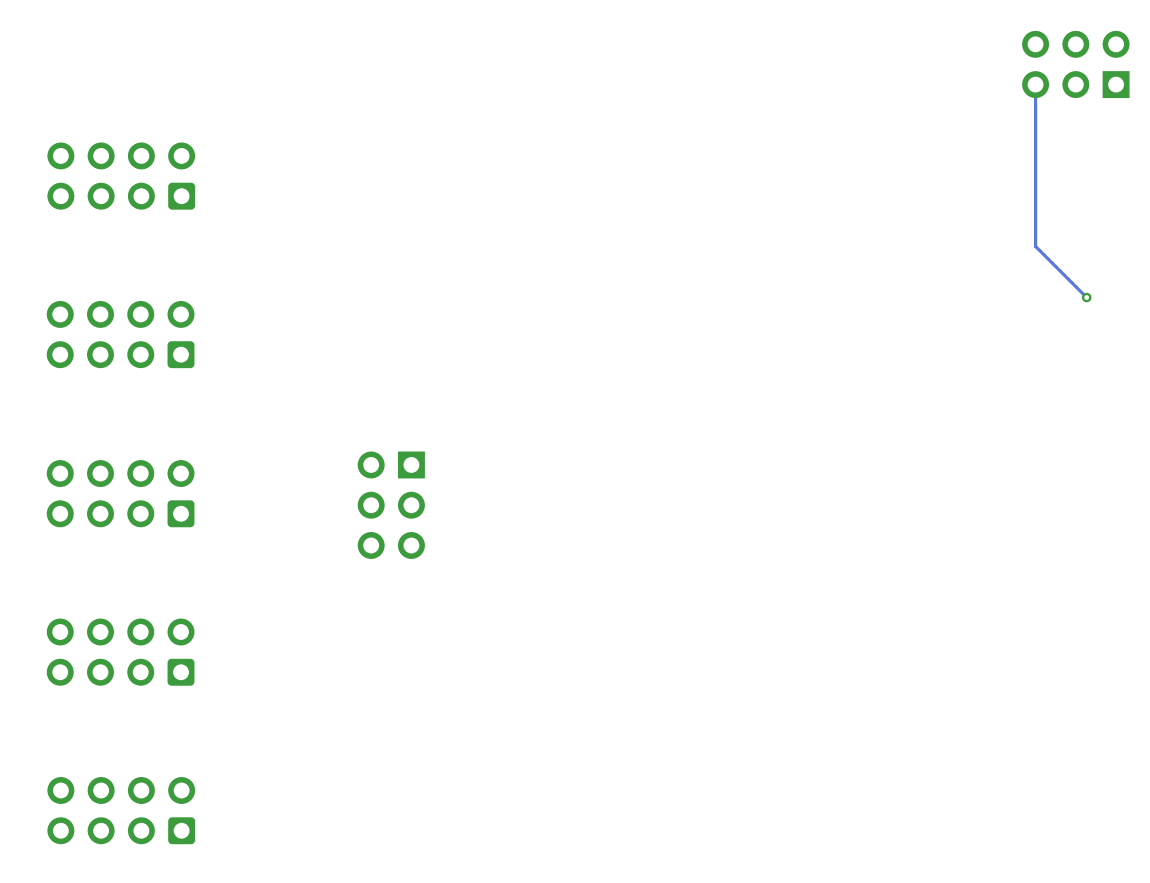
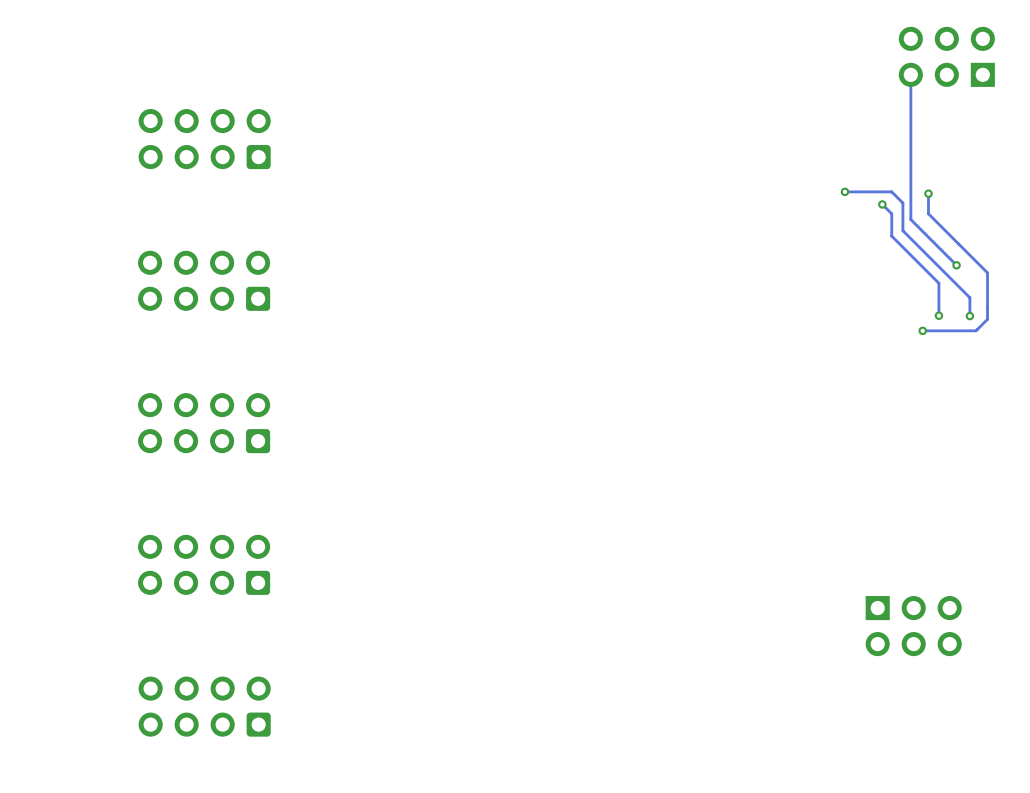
part: none -> (204, 139)
part: (121, 176) -> none
track: none -> (844, 191) (891, 191) (902, 203) (902, 230) (969, 297) (969, 316)
via: none -> (844, 191)
track: none -> (928, 193) (928, 213) (987, 272) (987, 319) (976, 330) (922, 330)
via: none -> (928, 193)
track: none -> (882, 204) (891, 213) (891, 236) (938, 283) (938, 315)
via: none -> (882, 204)
part: none -> (204, 280)
part: (120, 334) -> none
via: none -> (938, 315)
via: none -> (969, 316)
via: none -> (922, 330)
part: none -> (204, 423)
part: (120, 493) -> none
part: (391, 505) -> none
part: none -> (204, 564)
part: (120, 652) -> none
part: none -> (913, 626)
part: none -> (204, 706)
part: (121, 810) -> none

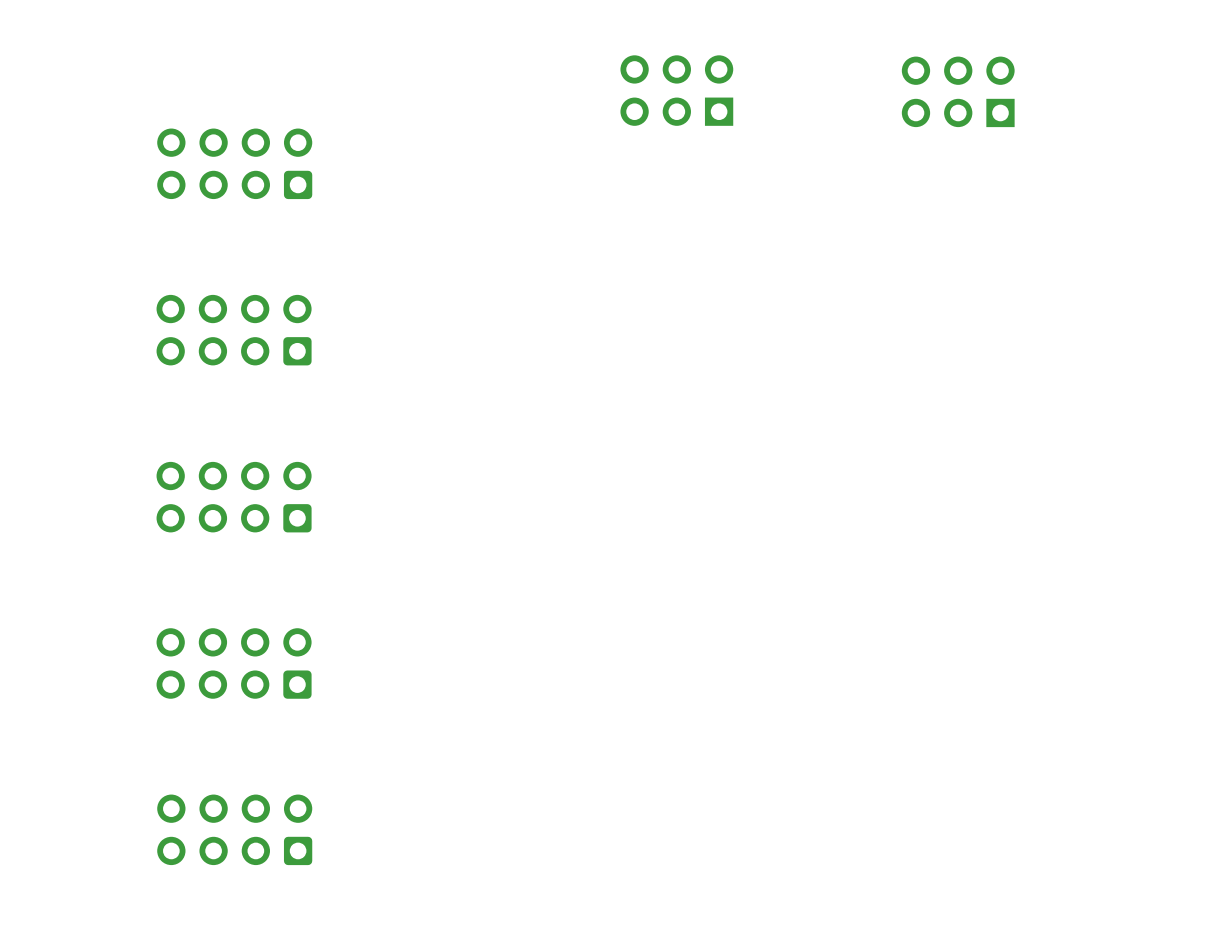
part position: (946, 56) -> (958, 91)
track: (910, 74) (910, 219) (956, 265) -> none
part: none -> (676, 90)
track: (844, 191) (891, 191) (902, 203) (902, 230) (969, 297) (969, 316) -> none
via: (844, 191) -> none
track: (928, 193) (928, 213) (987, 272) (987, 319) (976, 330) (922, 330) -> none
via: (928, 193) -> none
track: (882, 204) (891, 213) (891, 236) (938, 283) (938, 315) -> none
via: (882, 204) -> none
via: (956, 265) -> none
via: (938, 315) -> none
via: (969, 316) -> none
via: (922, 330) -> none
part: (913, 626) -> none

